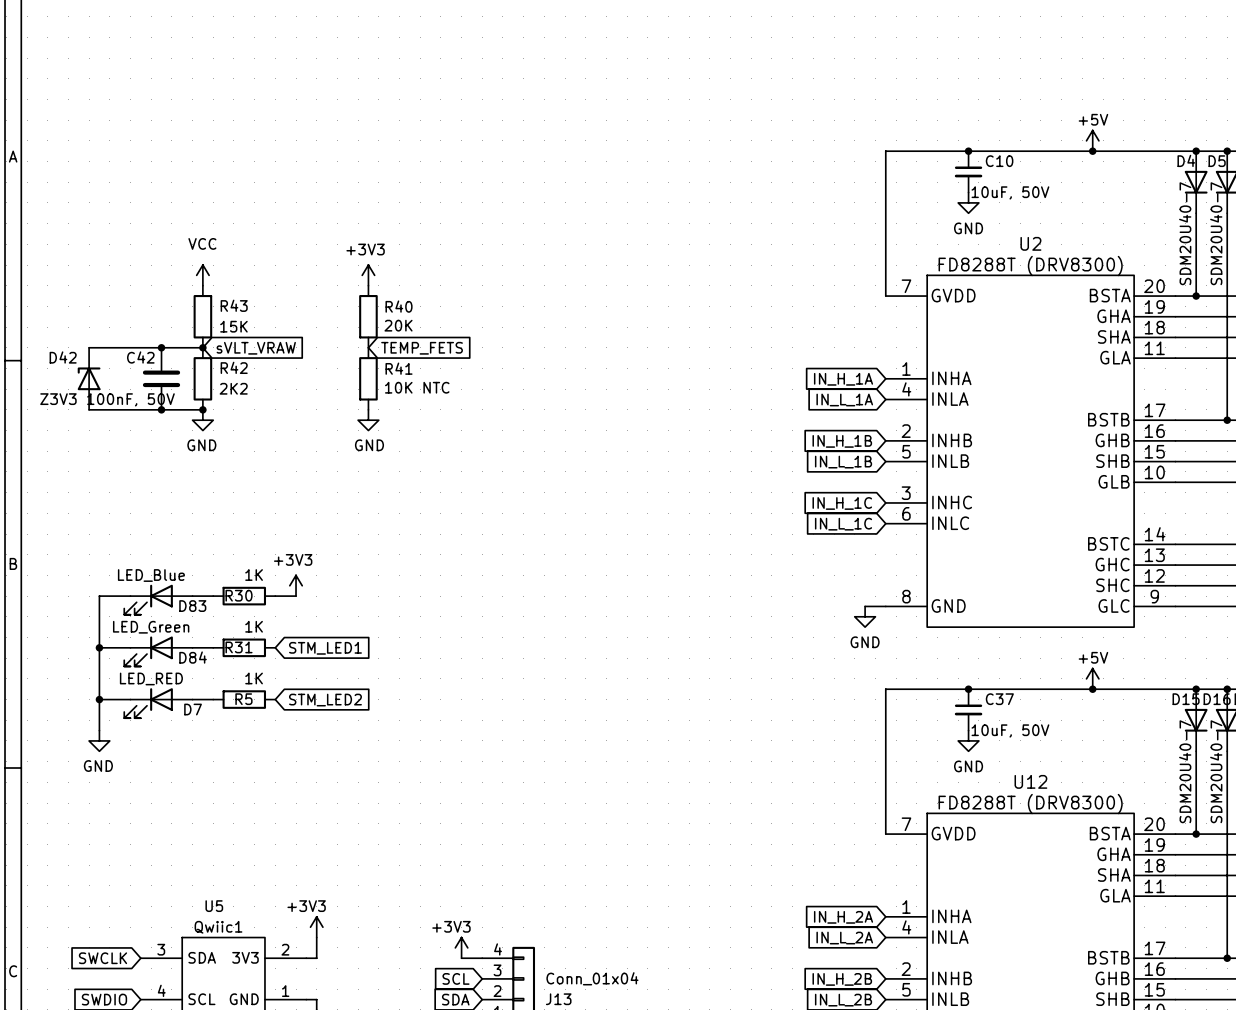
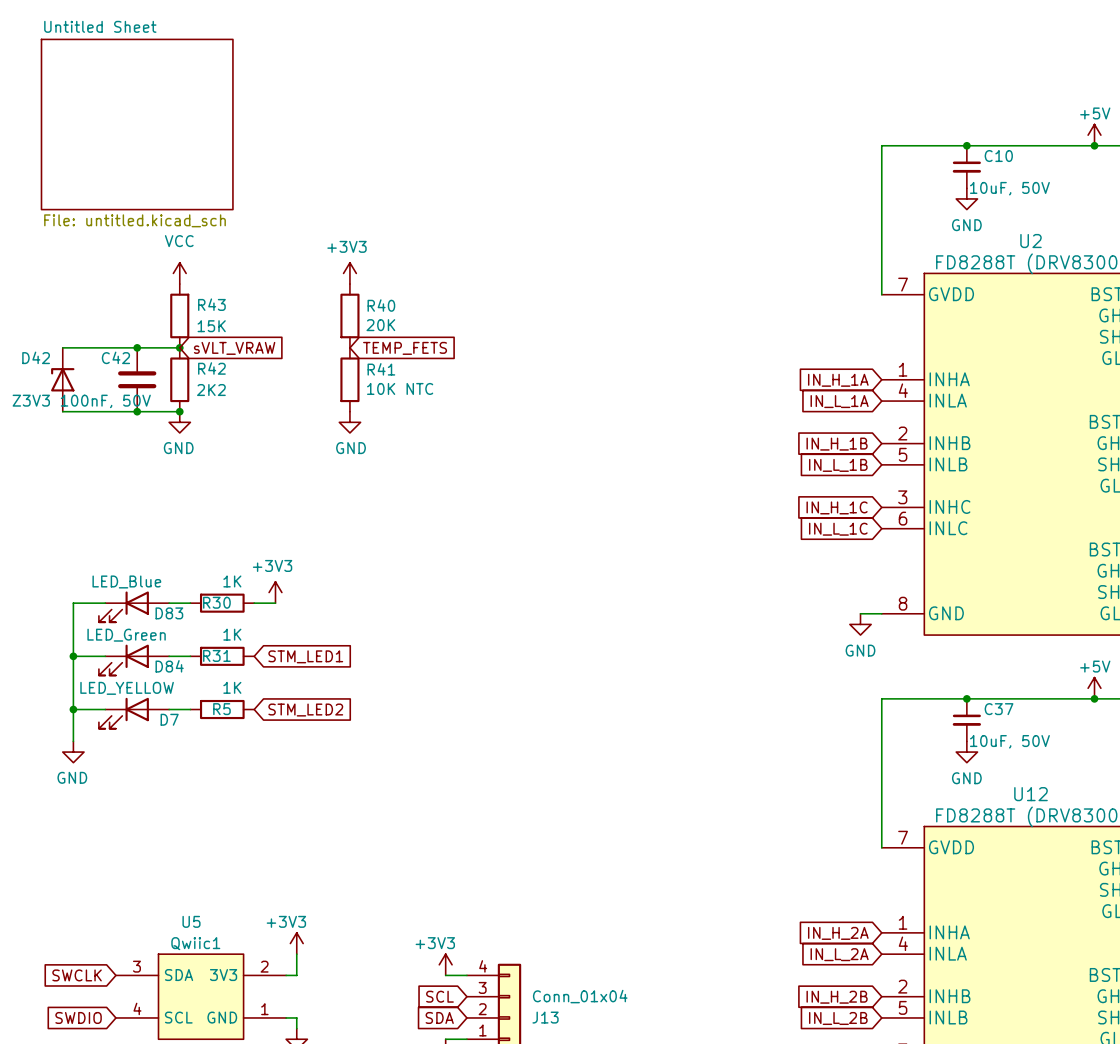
sheet Untitled Sheet: none -> File: untitled.kicad_sch (137, 124)
D7 value: LED_RED (151, 678) -> LED_YELLOW (127, 688)

